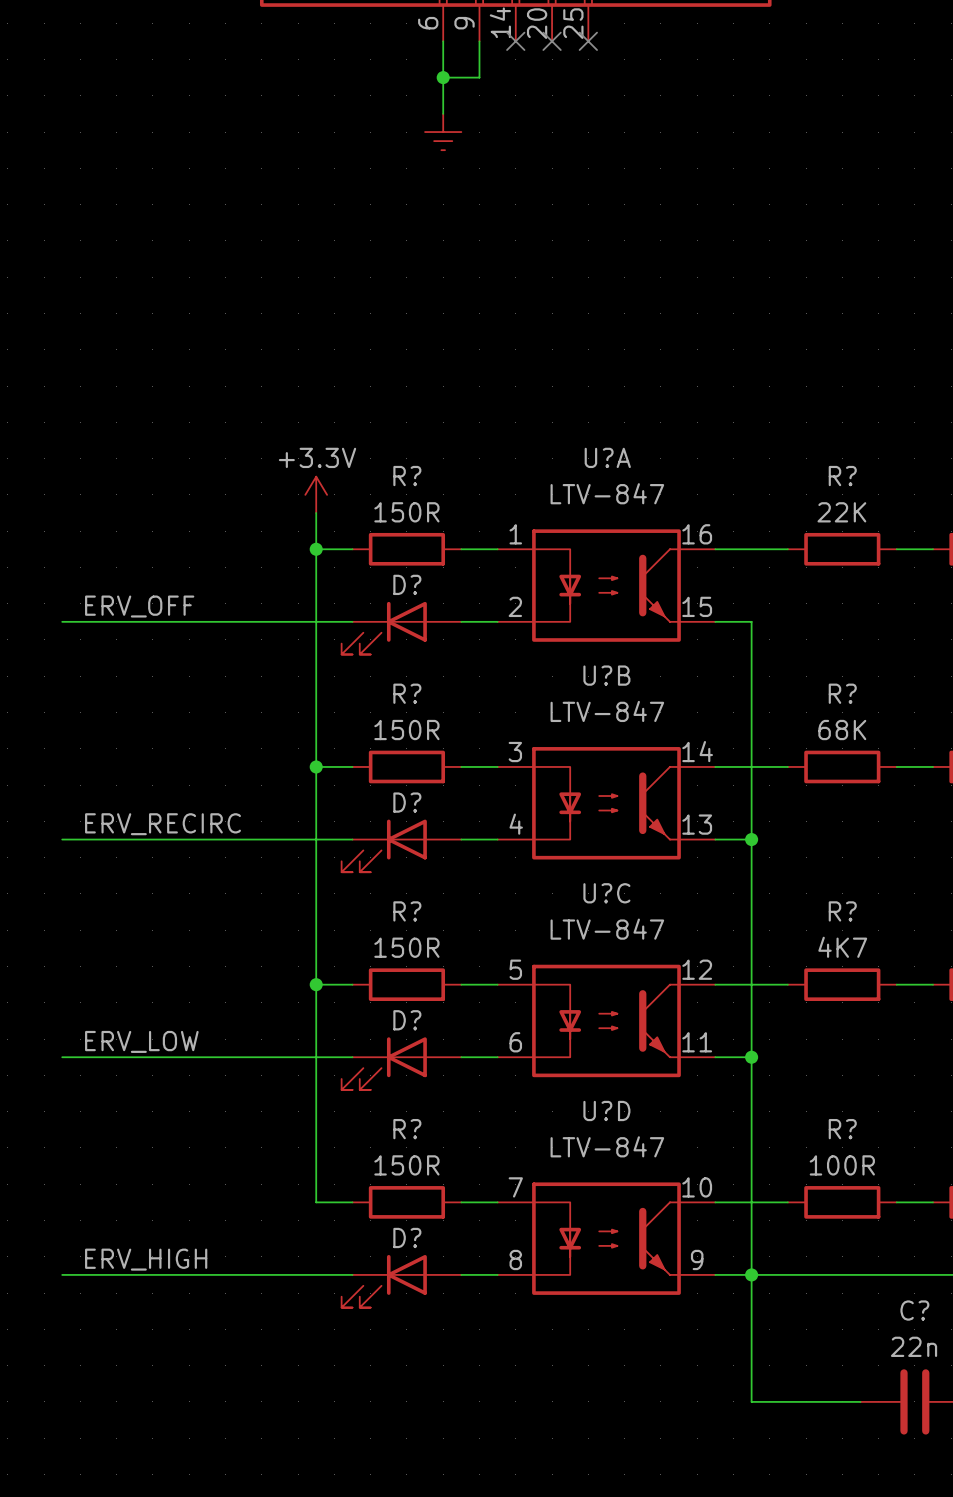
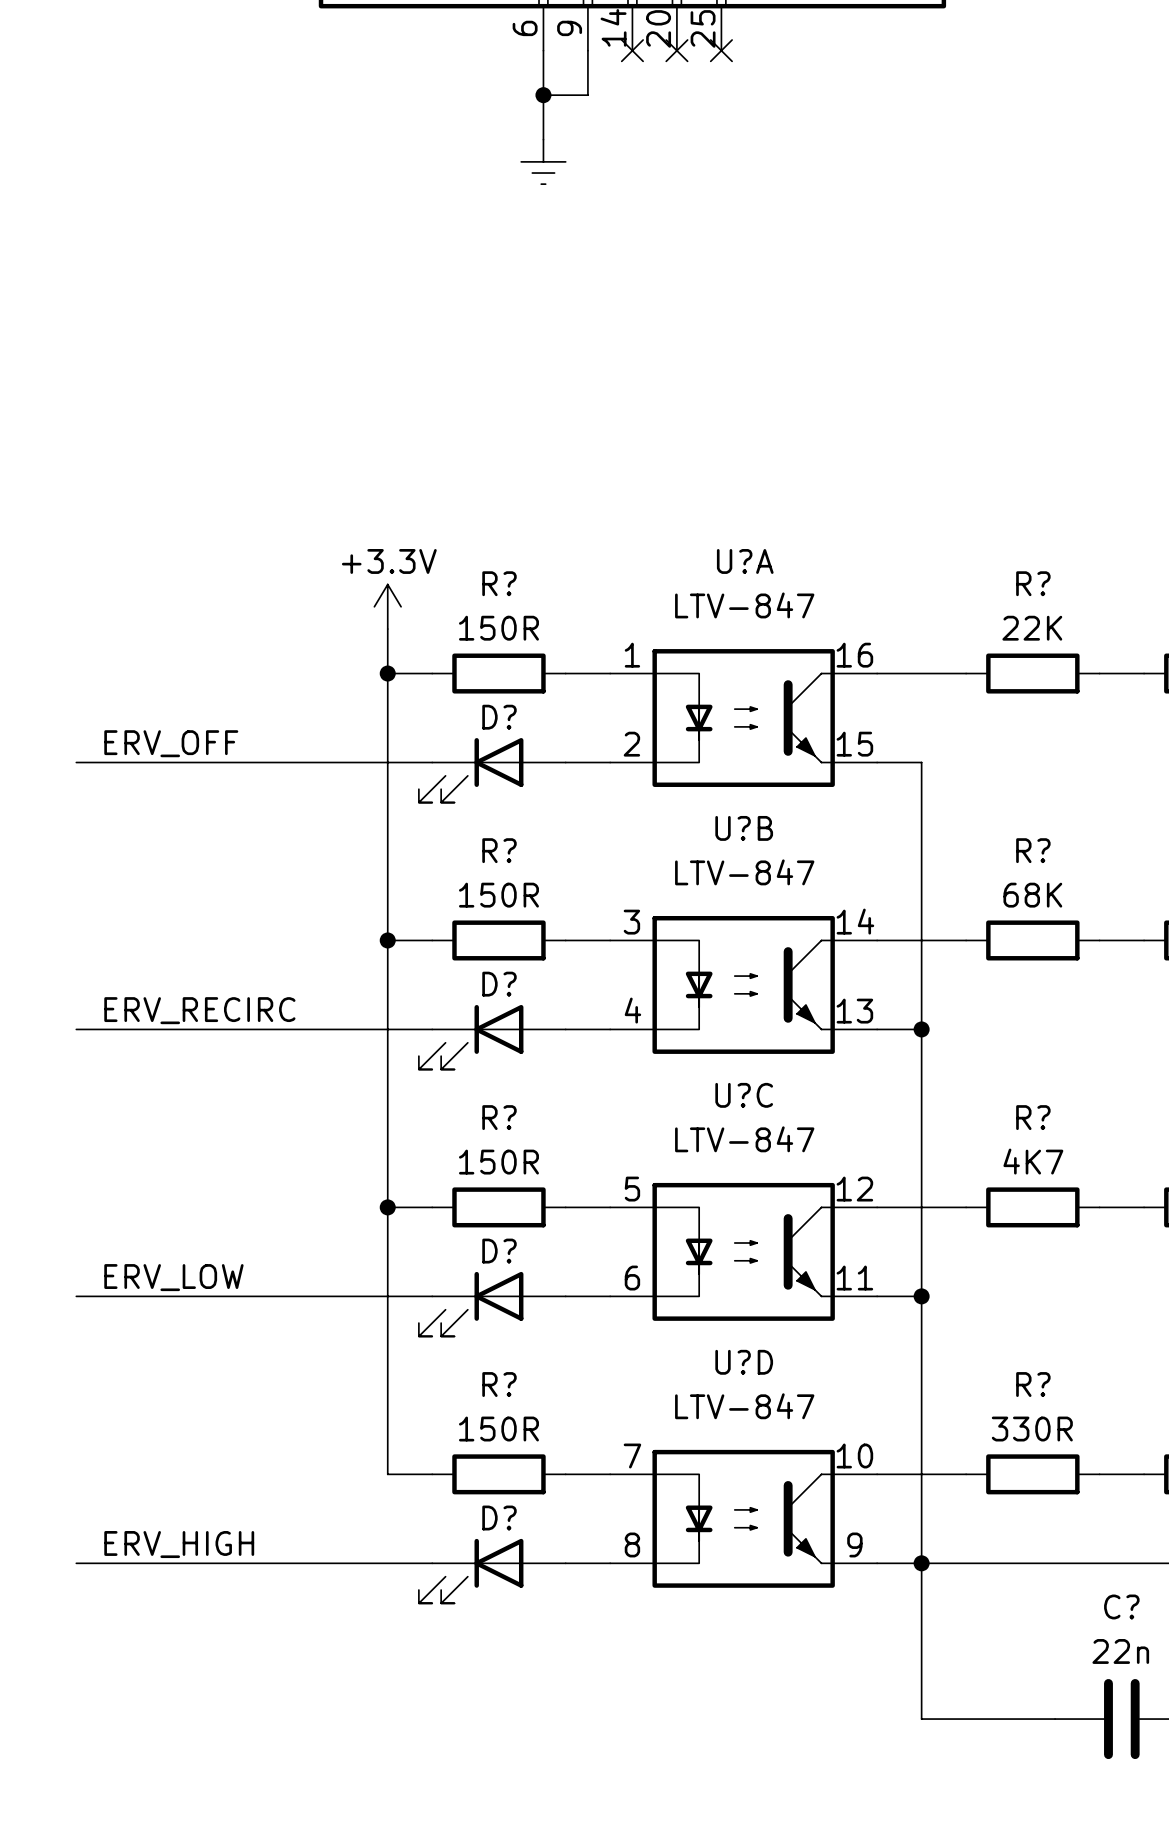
R? value: 100R (842, 1165) -> 330R (1032, 1429)

